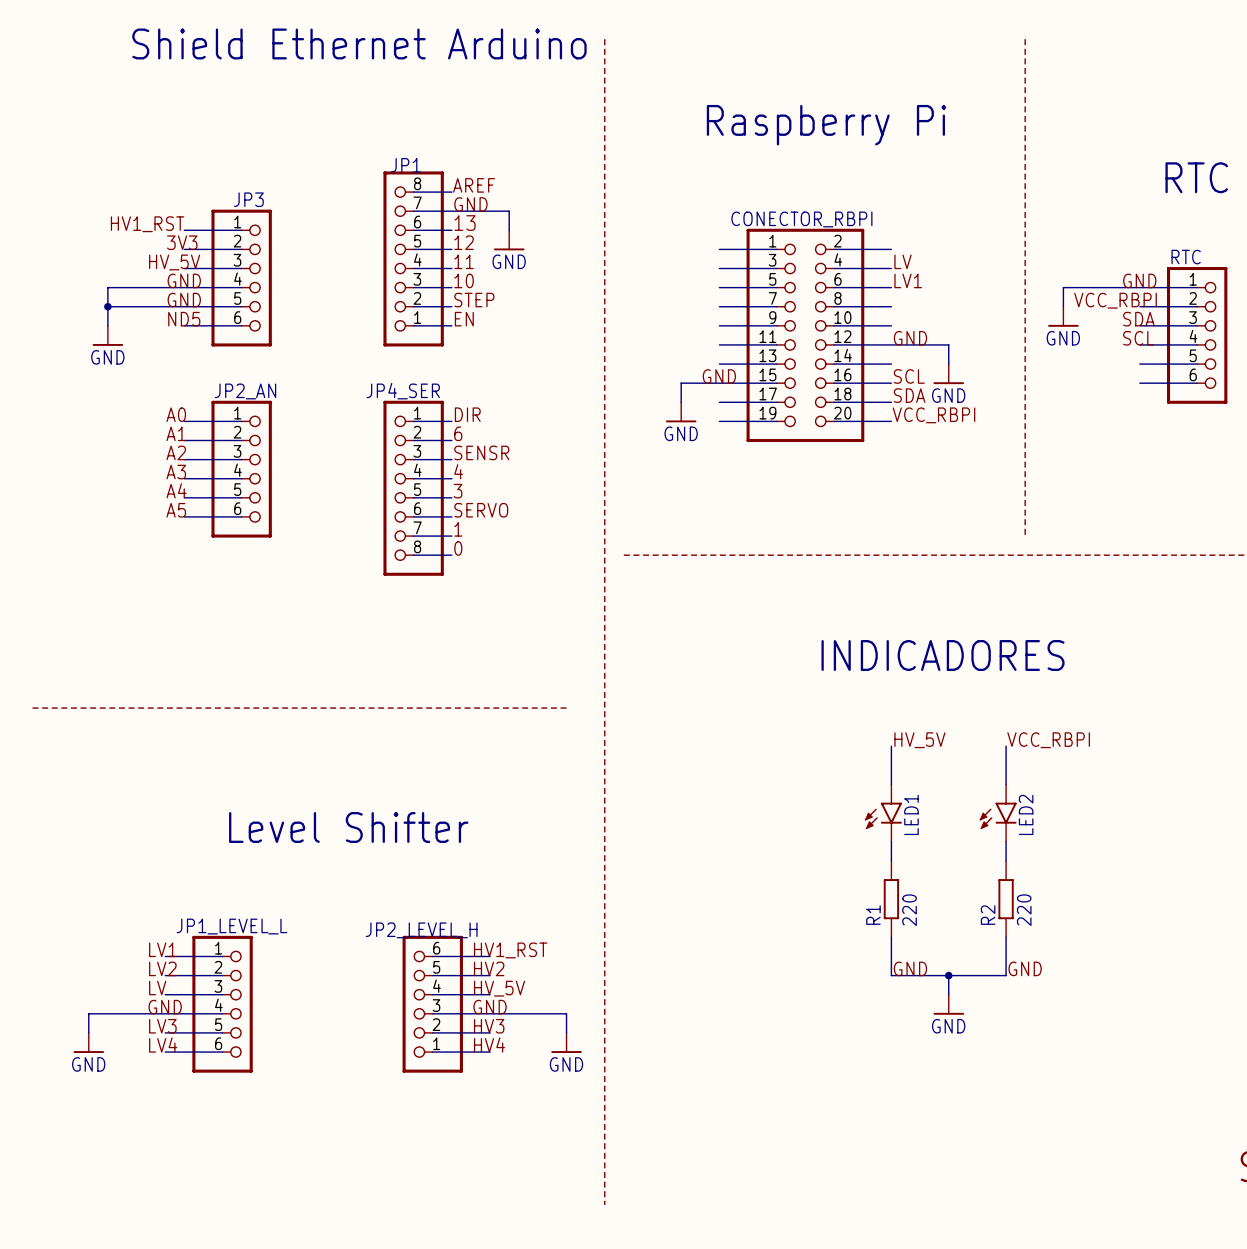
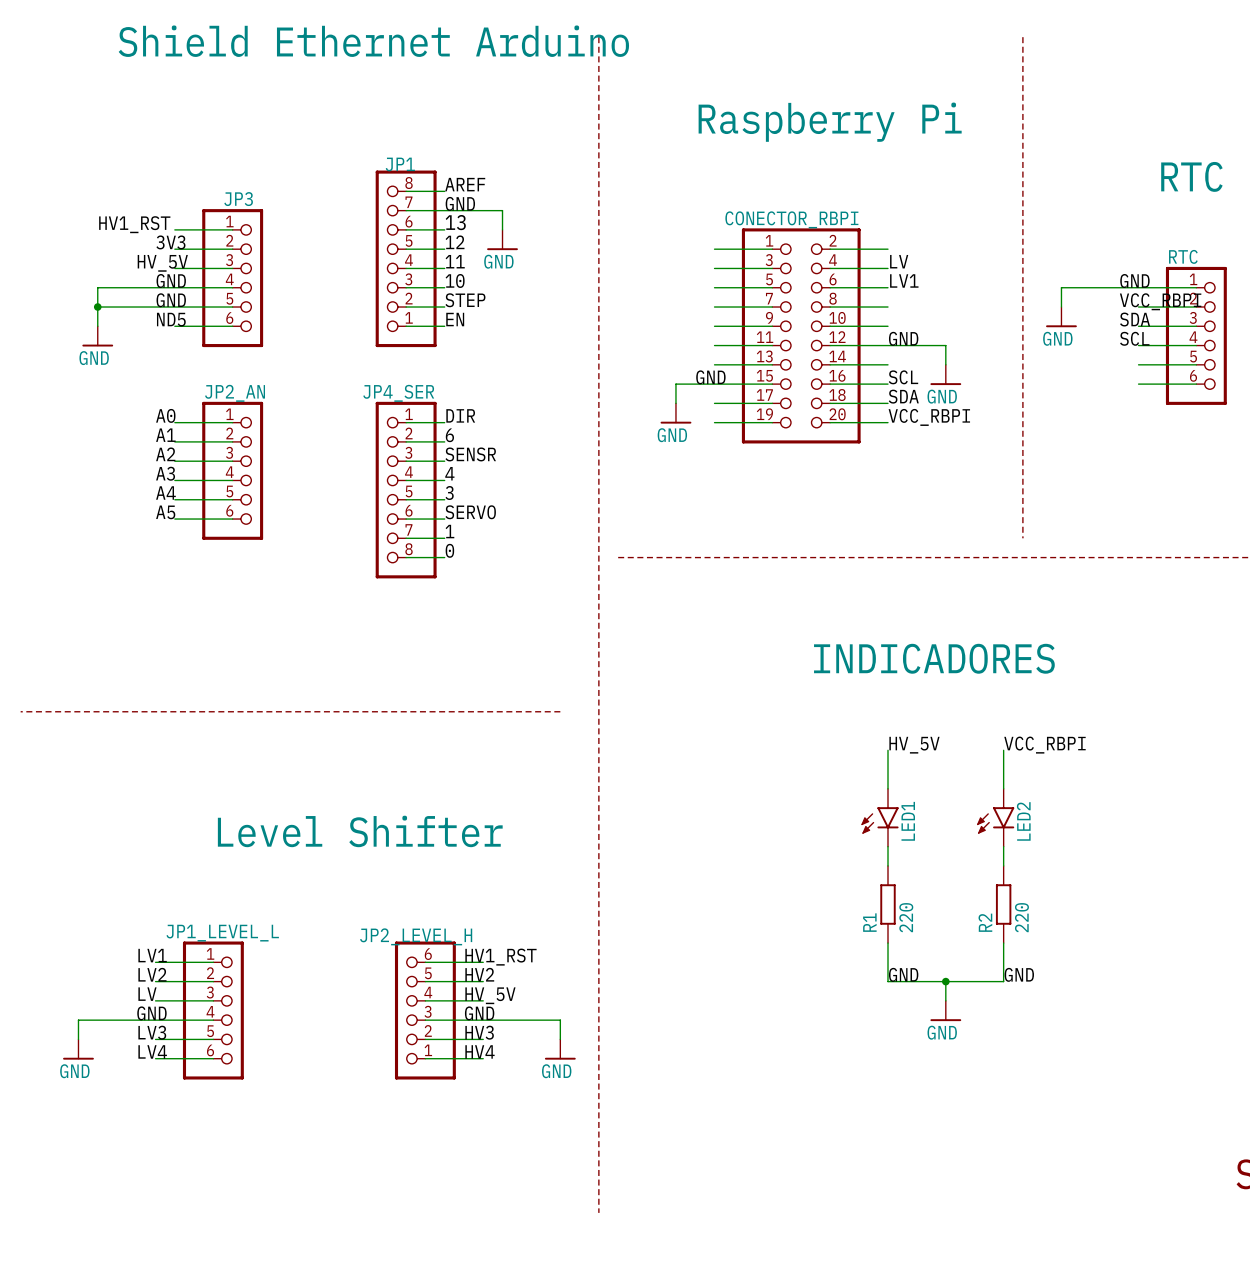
label position: VCC_RBPI (1115, 300) -> VCC_RBPI (1160, 301)

